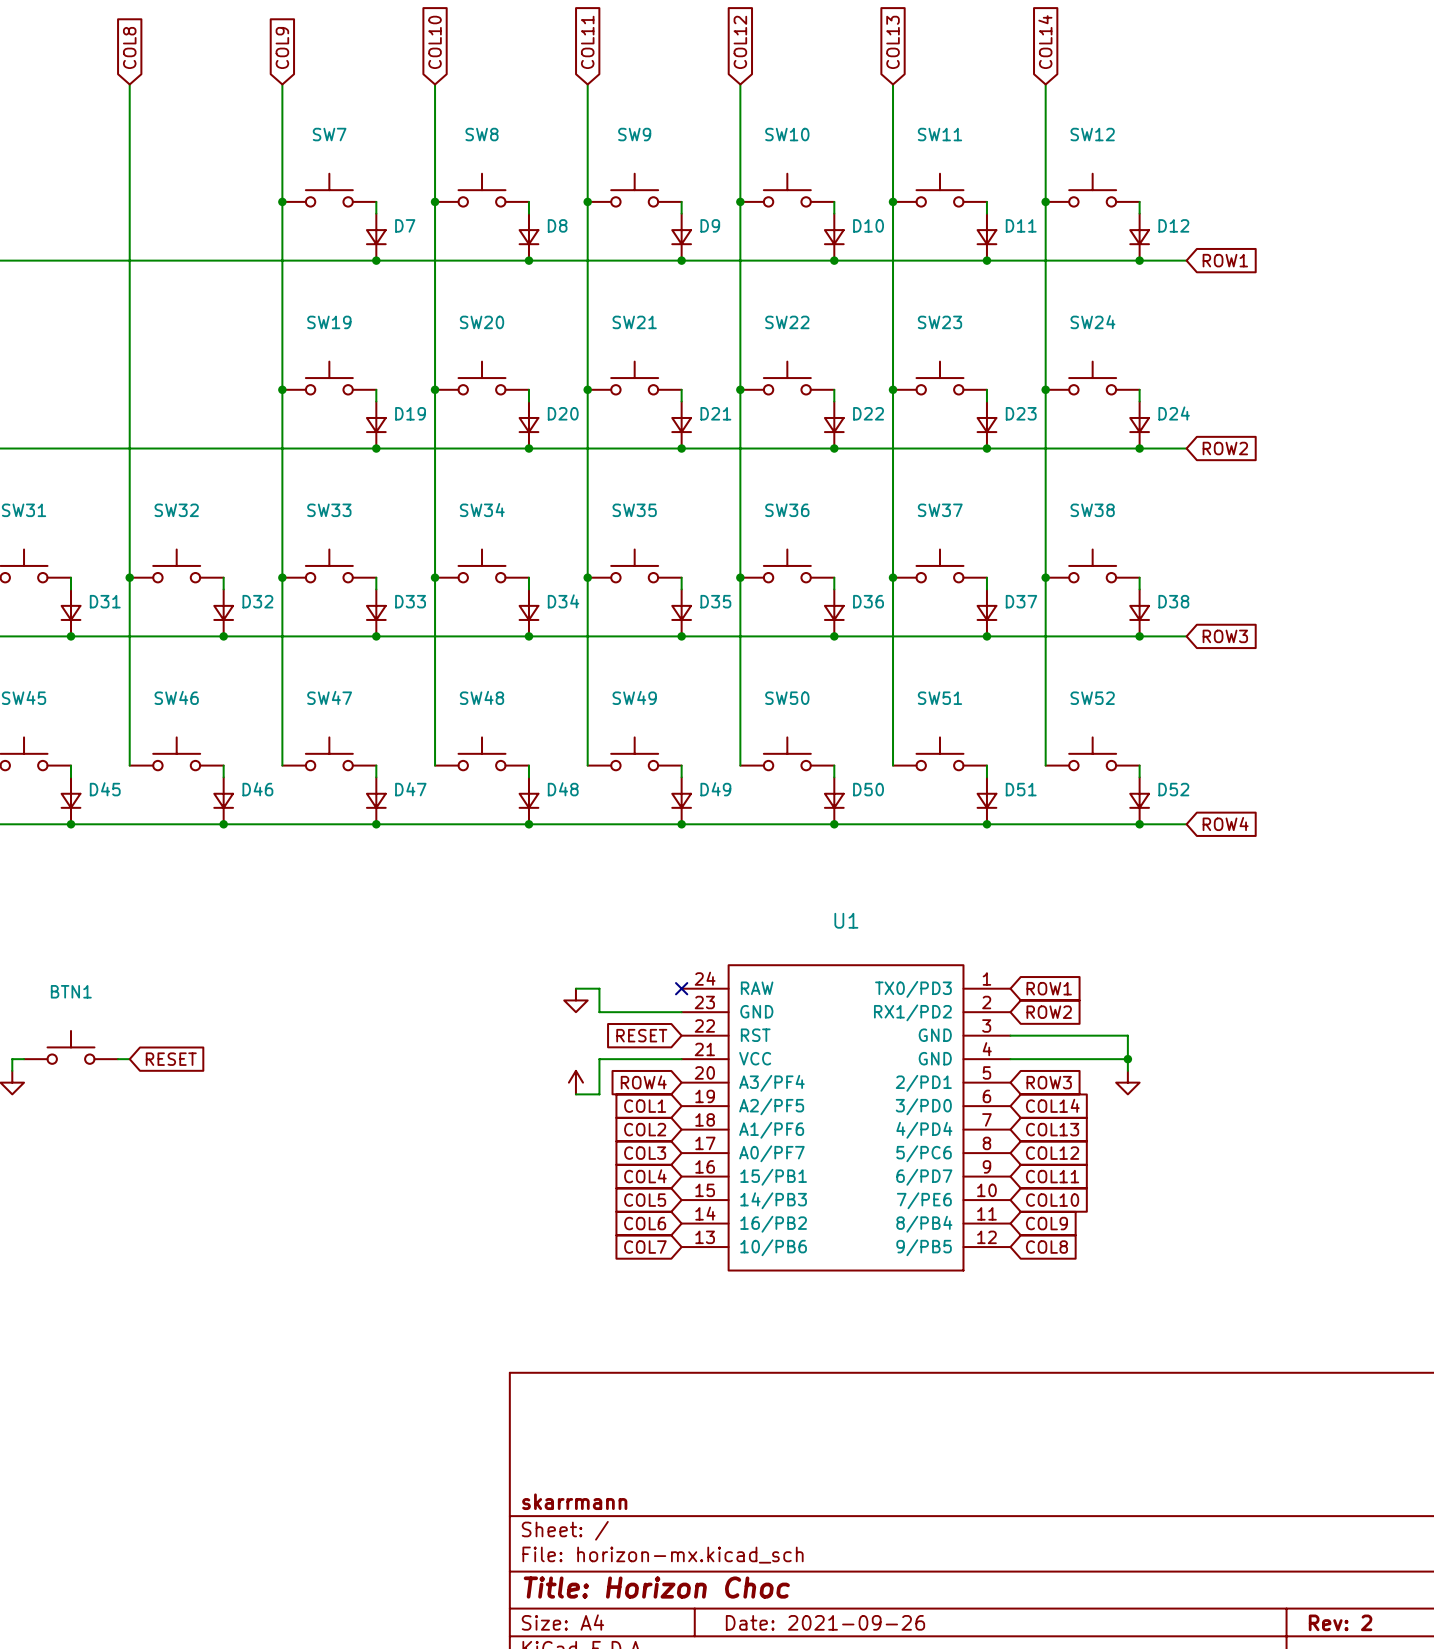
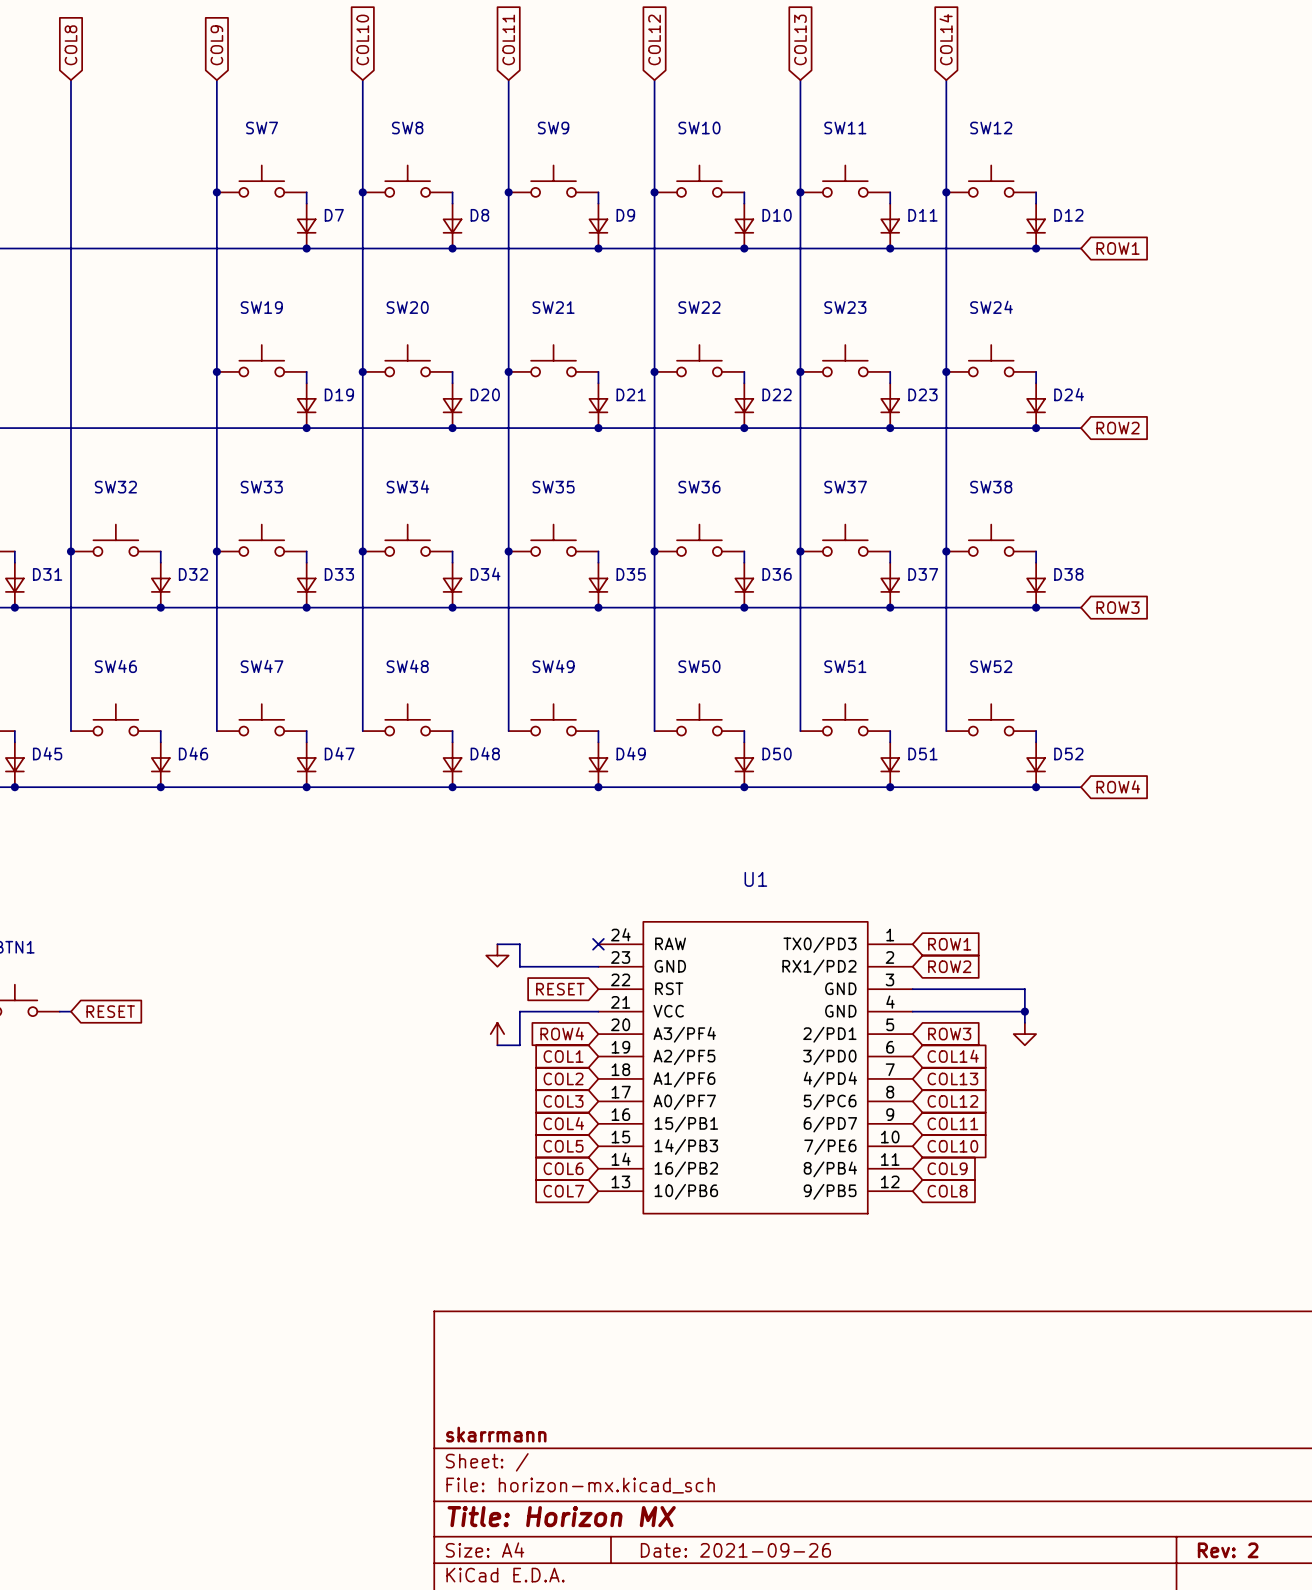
title block: Title: Horizon Choc (656, 1587) -> Title: Horizon MX (561, 1516)

